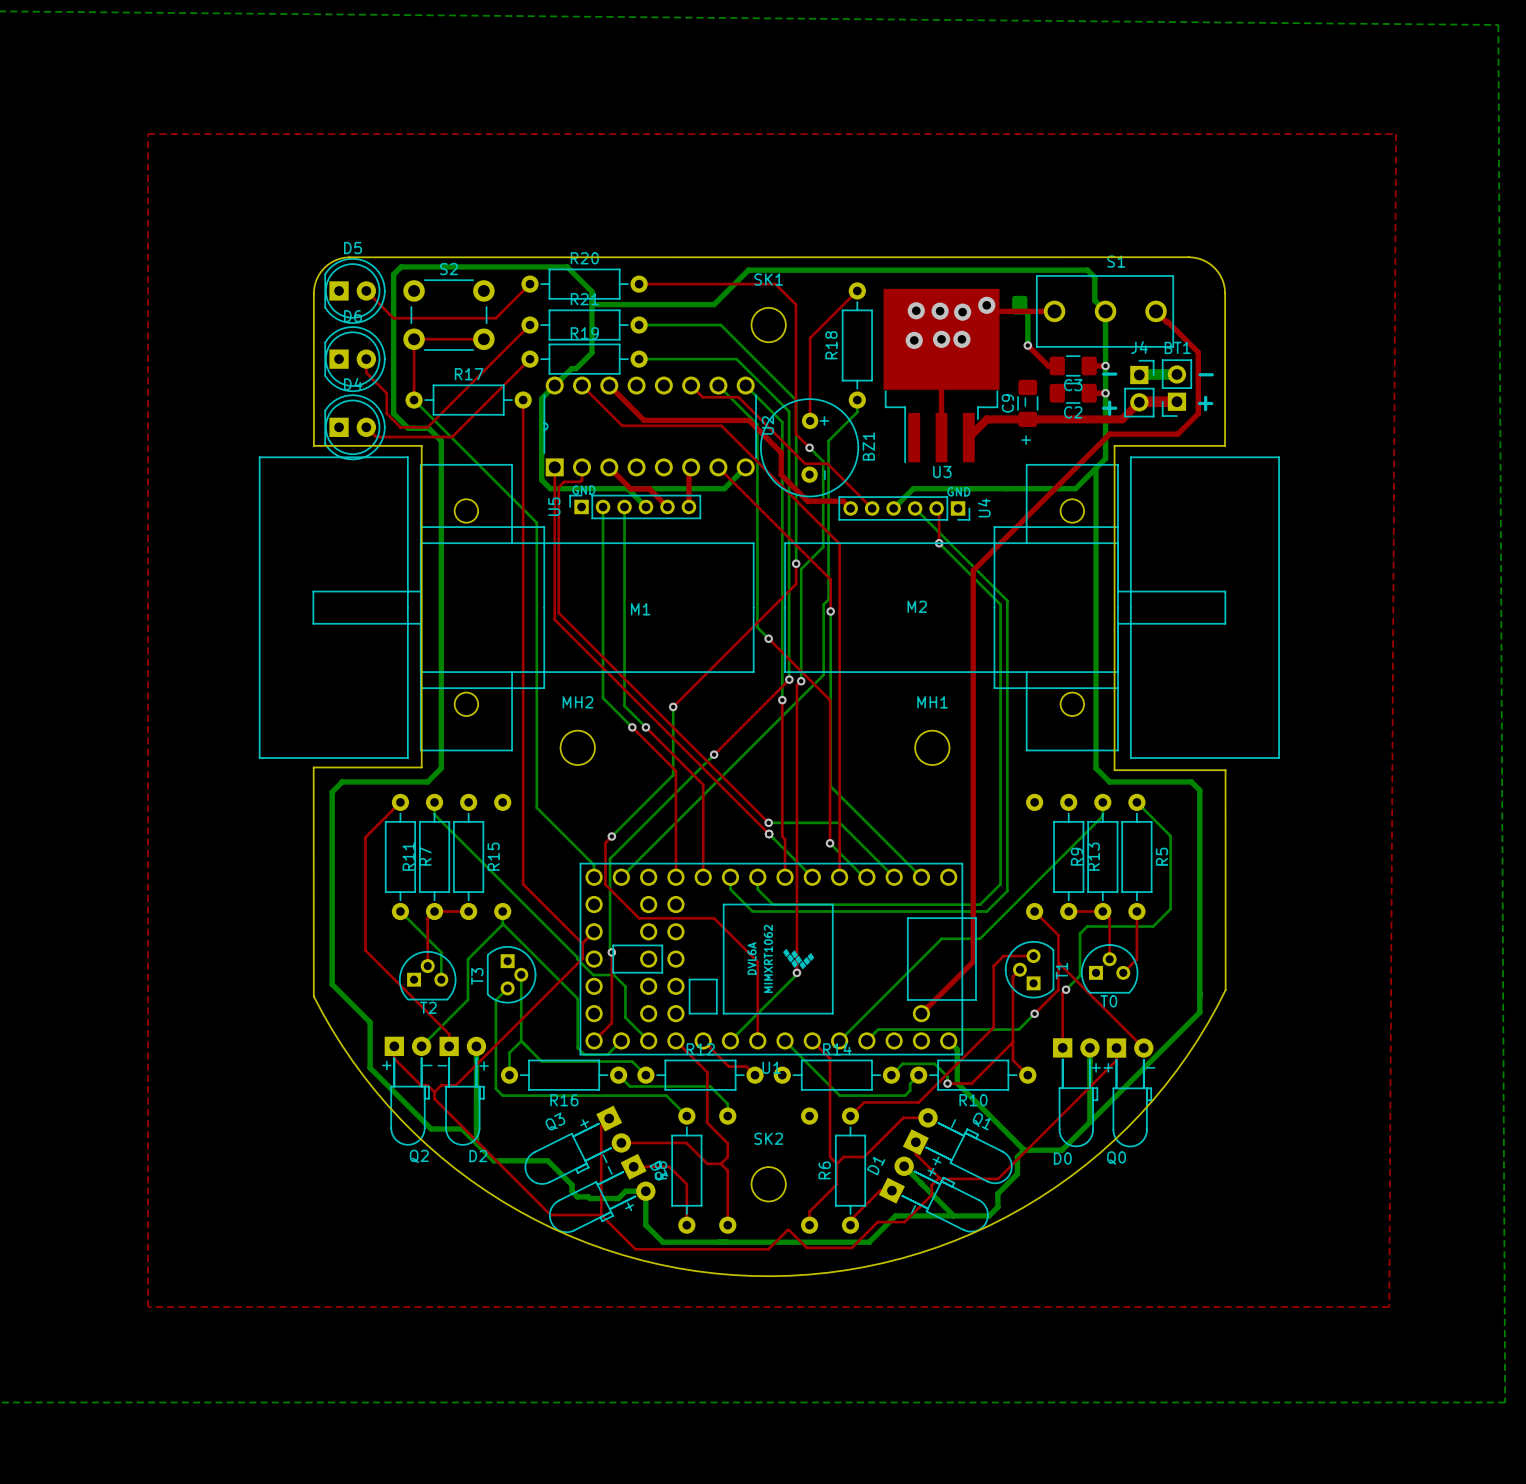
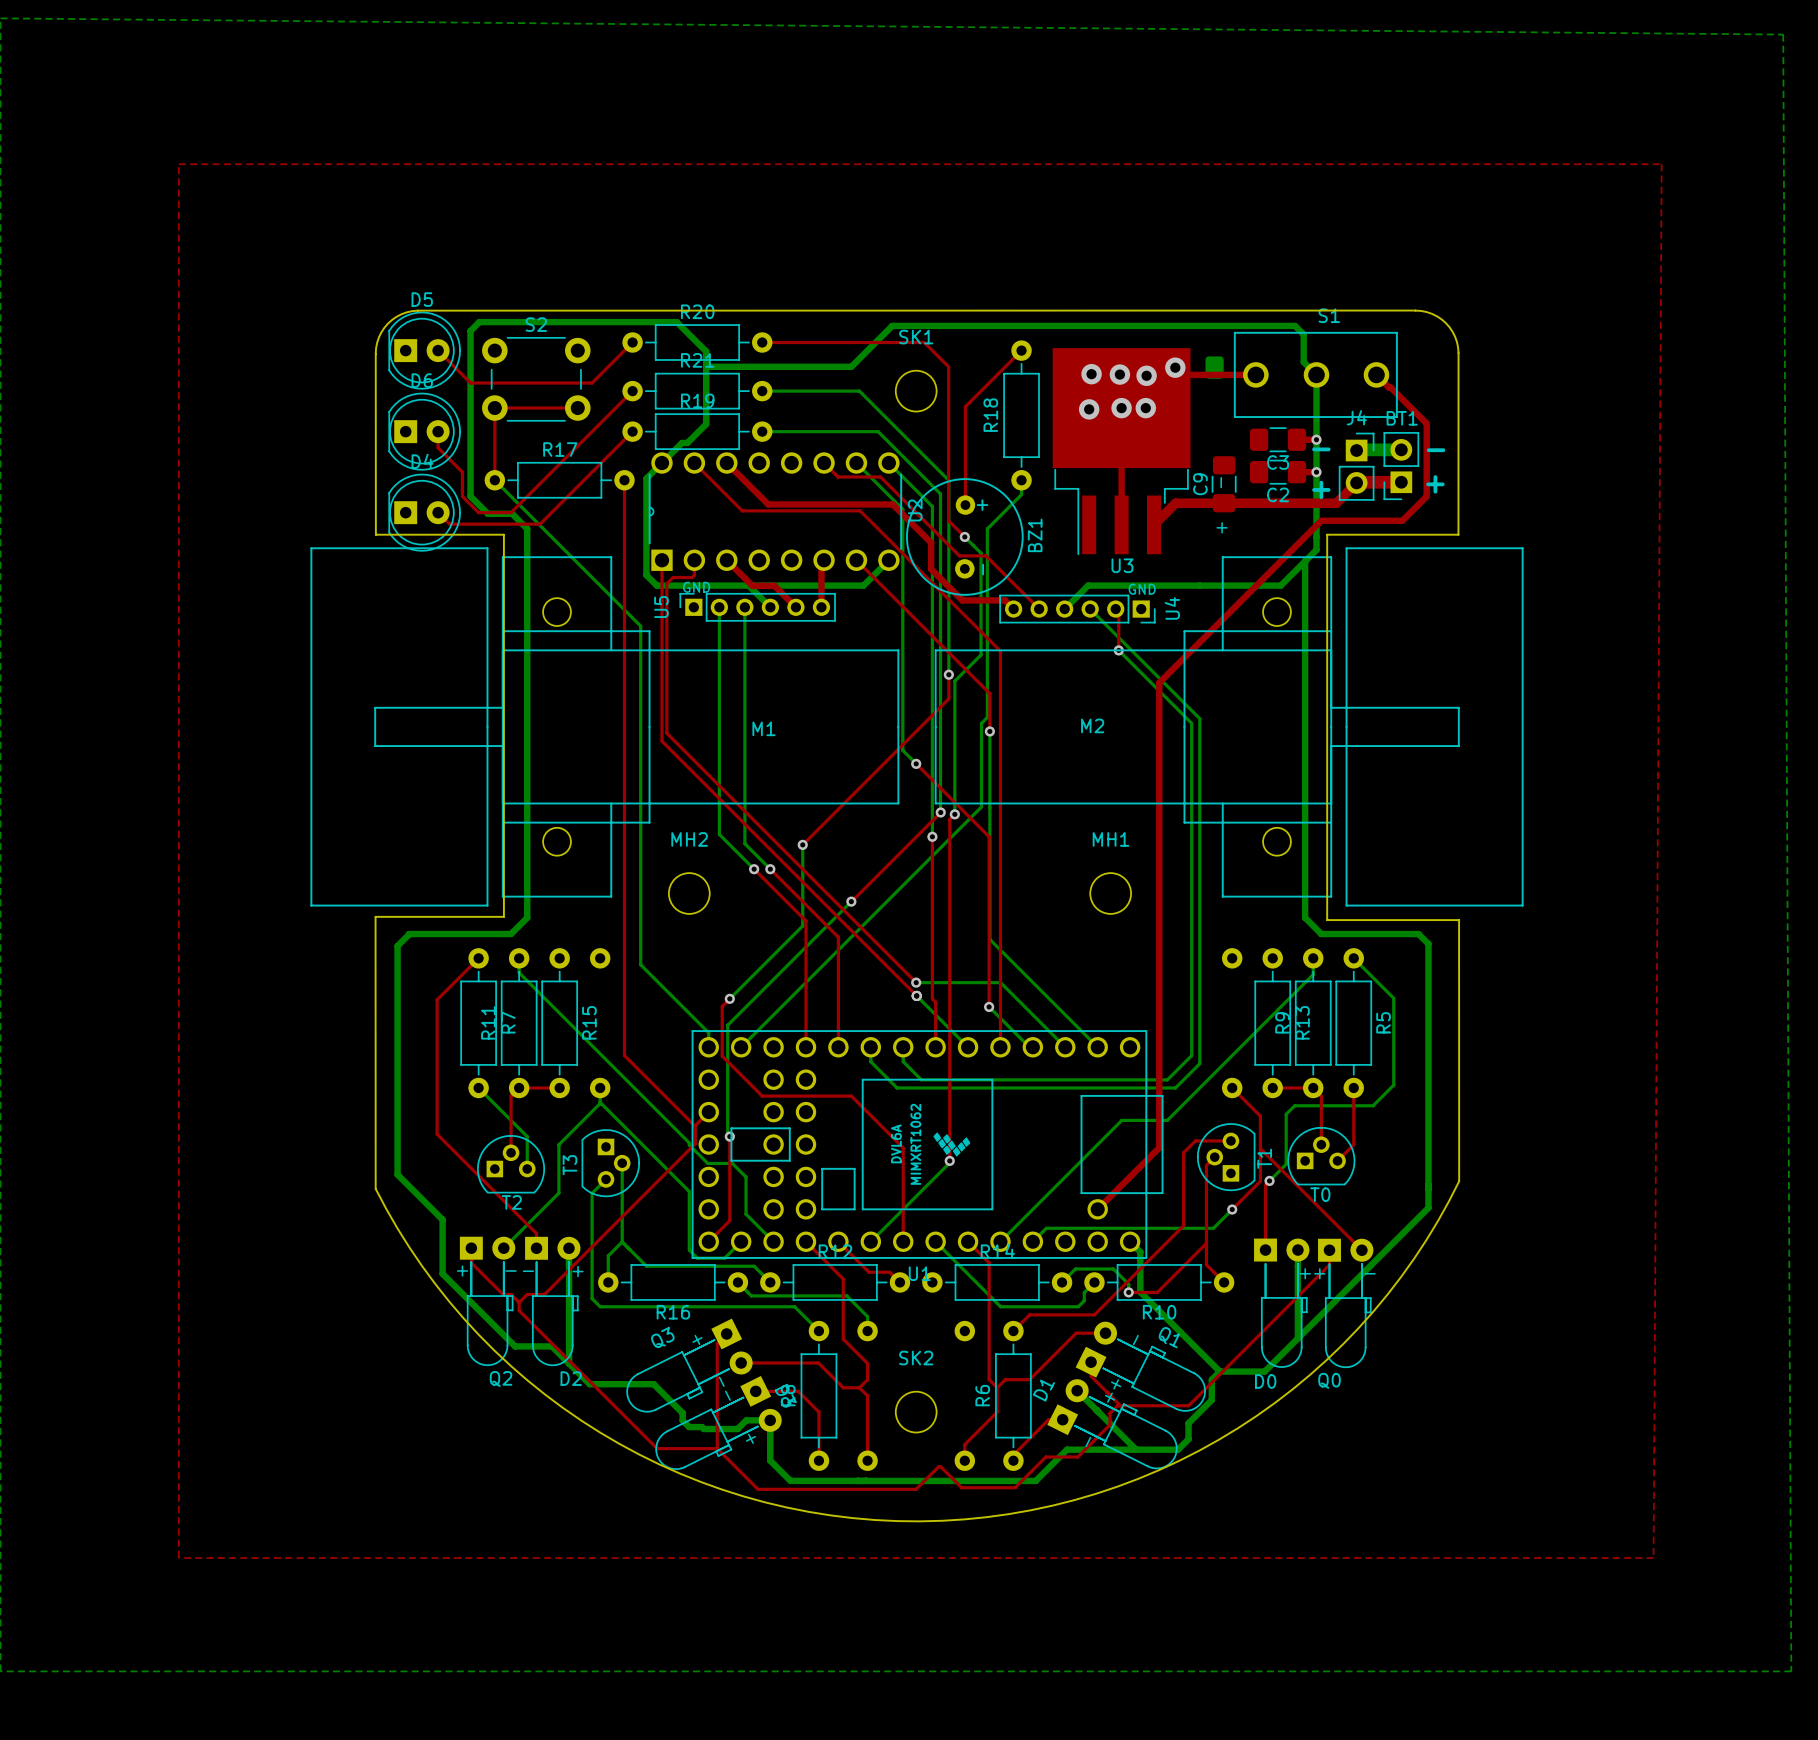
bottom track: (1019, 305) (1027, 313) (1027, 345) -> none
top track: (1027, 345) (1048, 365) (1057, 365) -> none
via: (1027, 345) -> none

